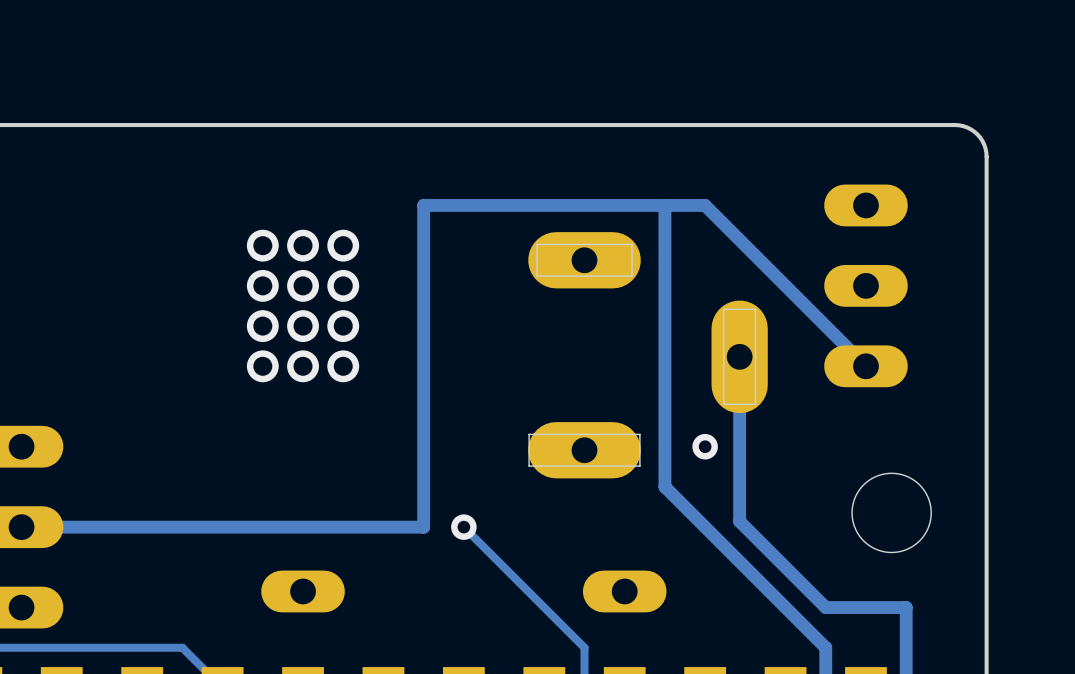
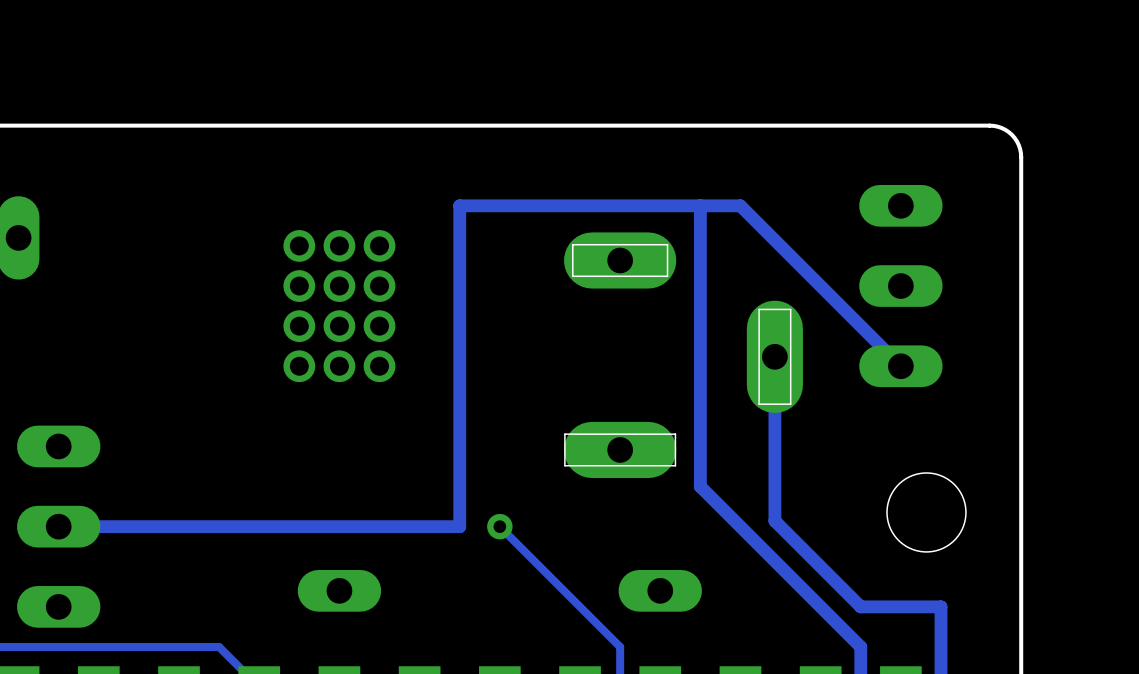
via: (705, 446) -> none

